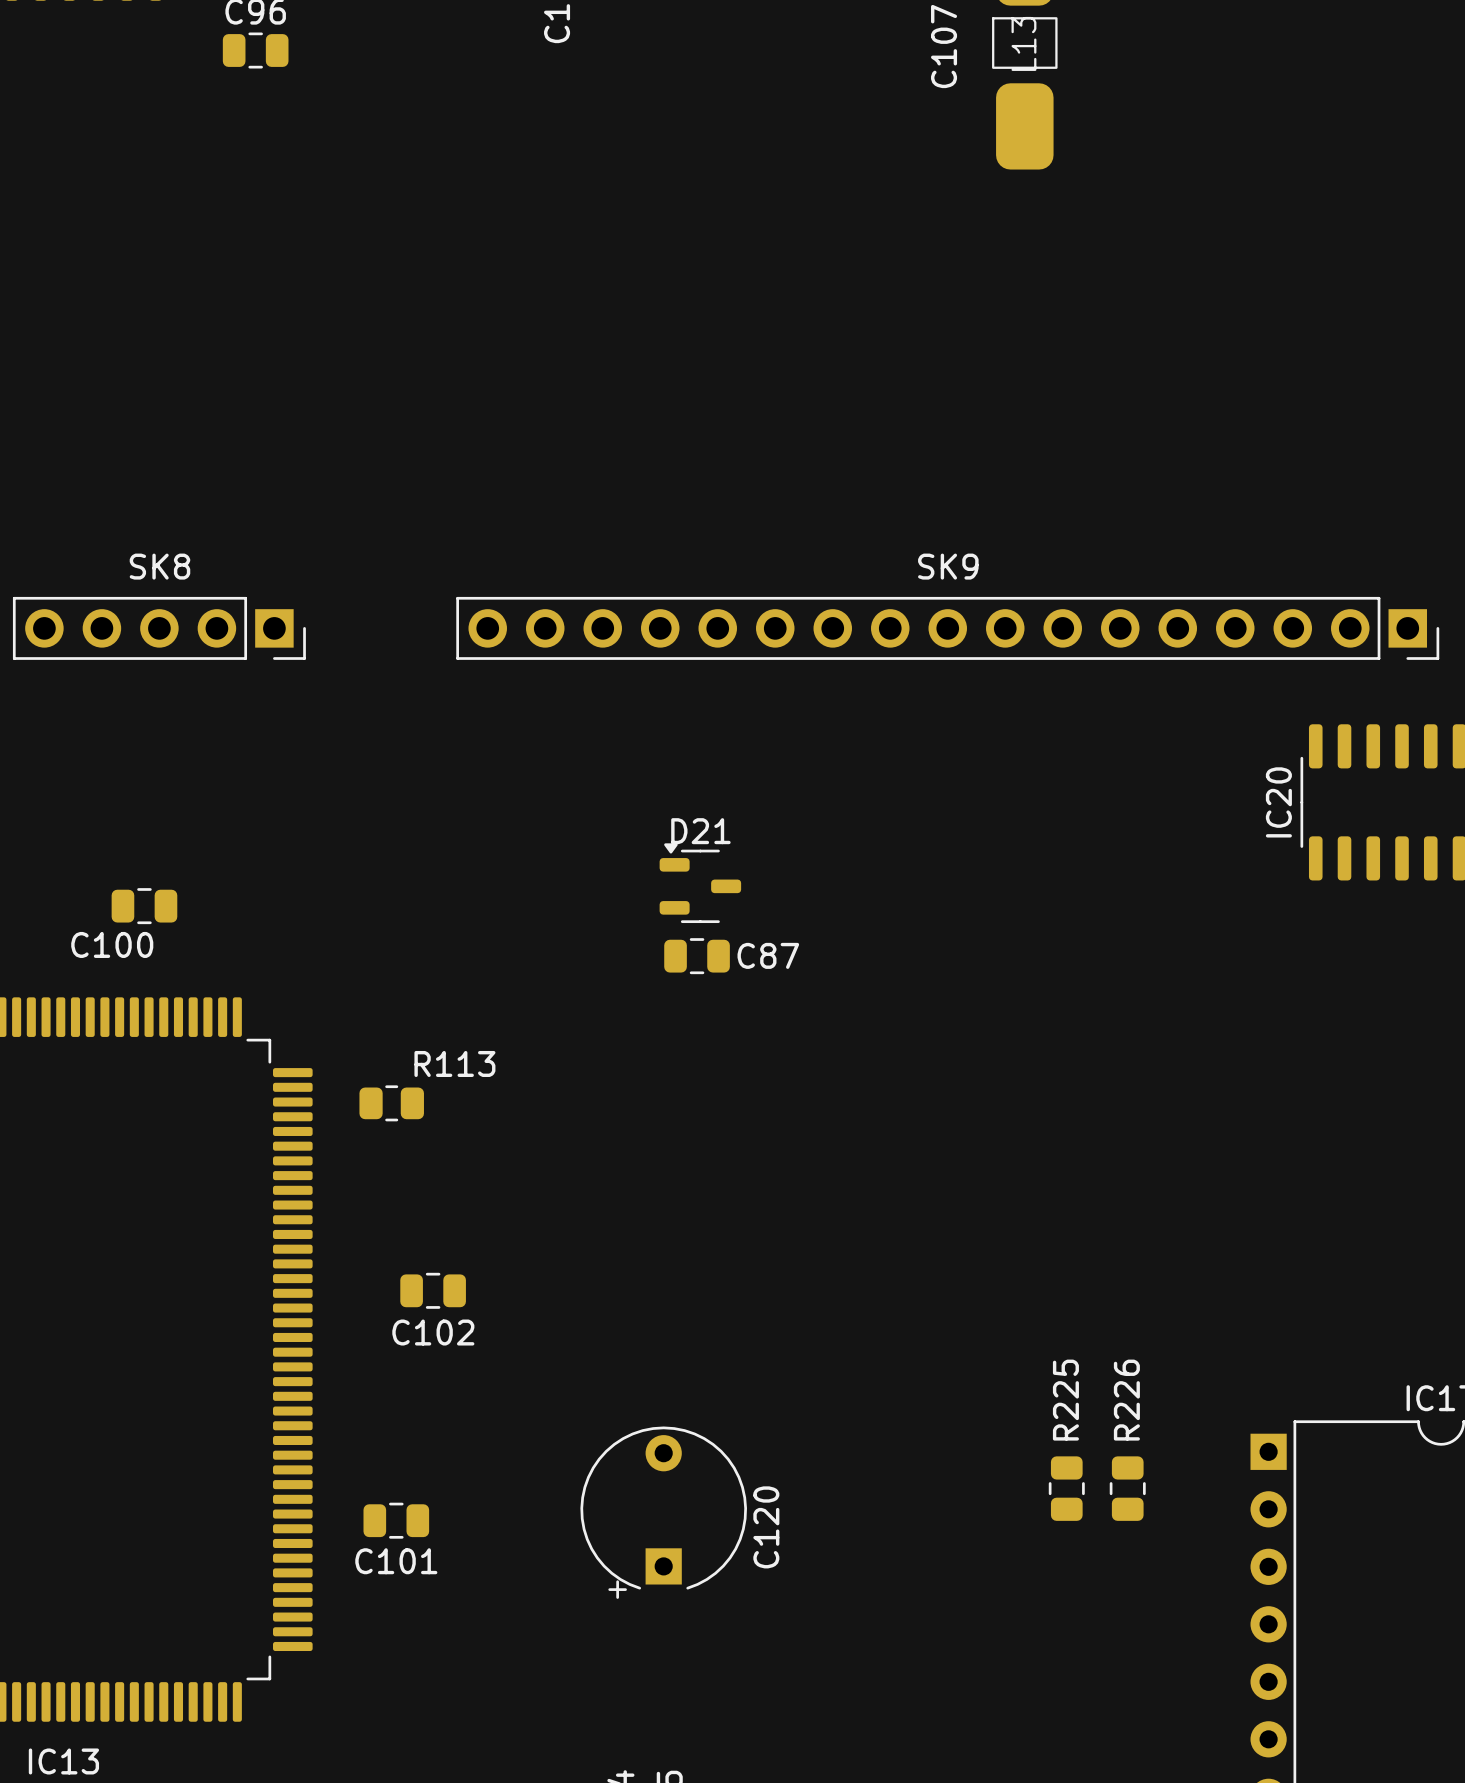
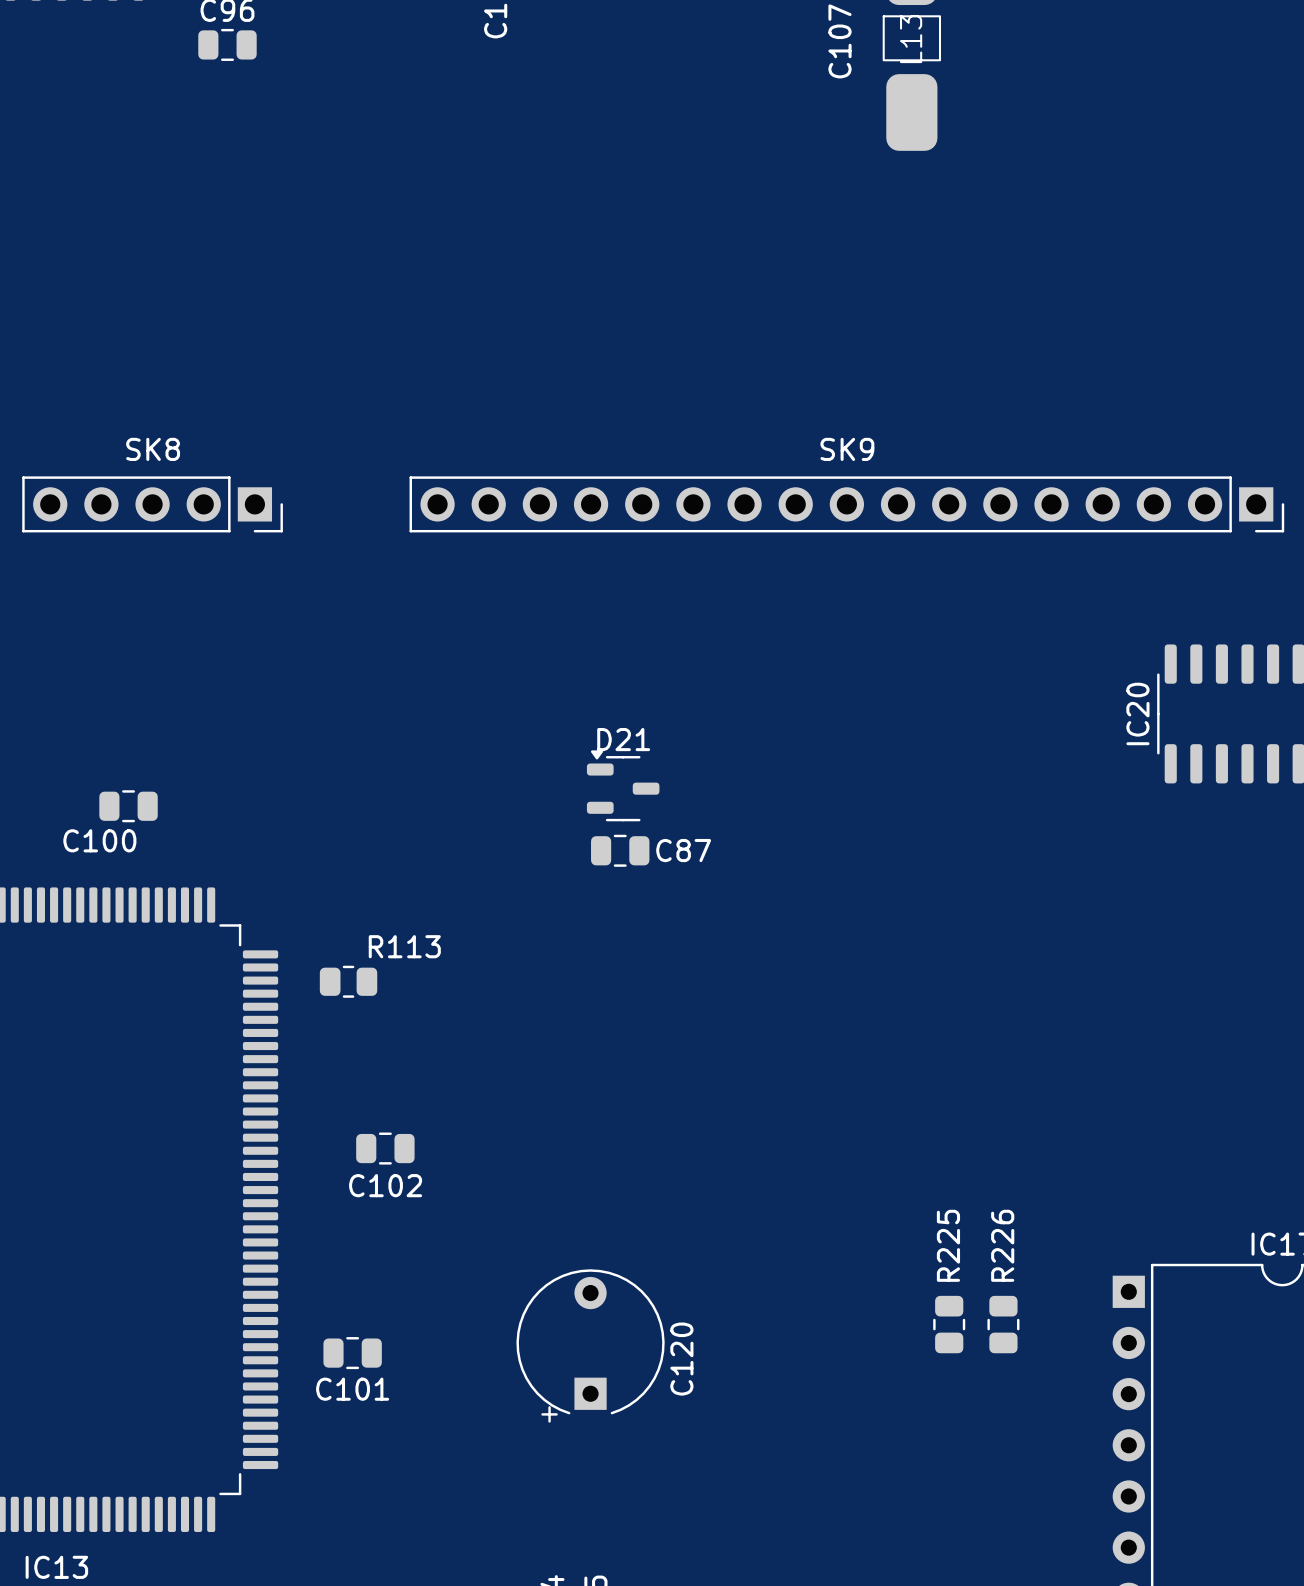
SK8 position: (159, 628) -> (152, 504)
SK9 position: (947, 628) -> (846, 504)

